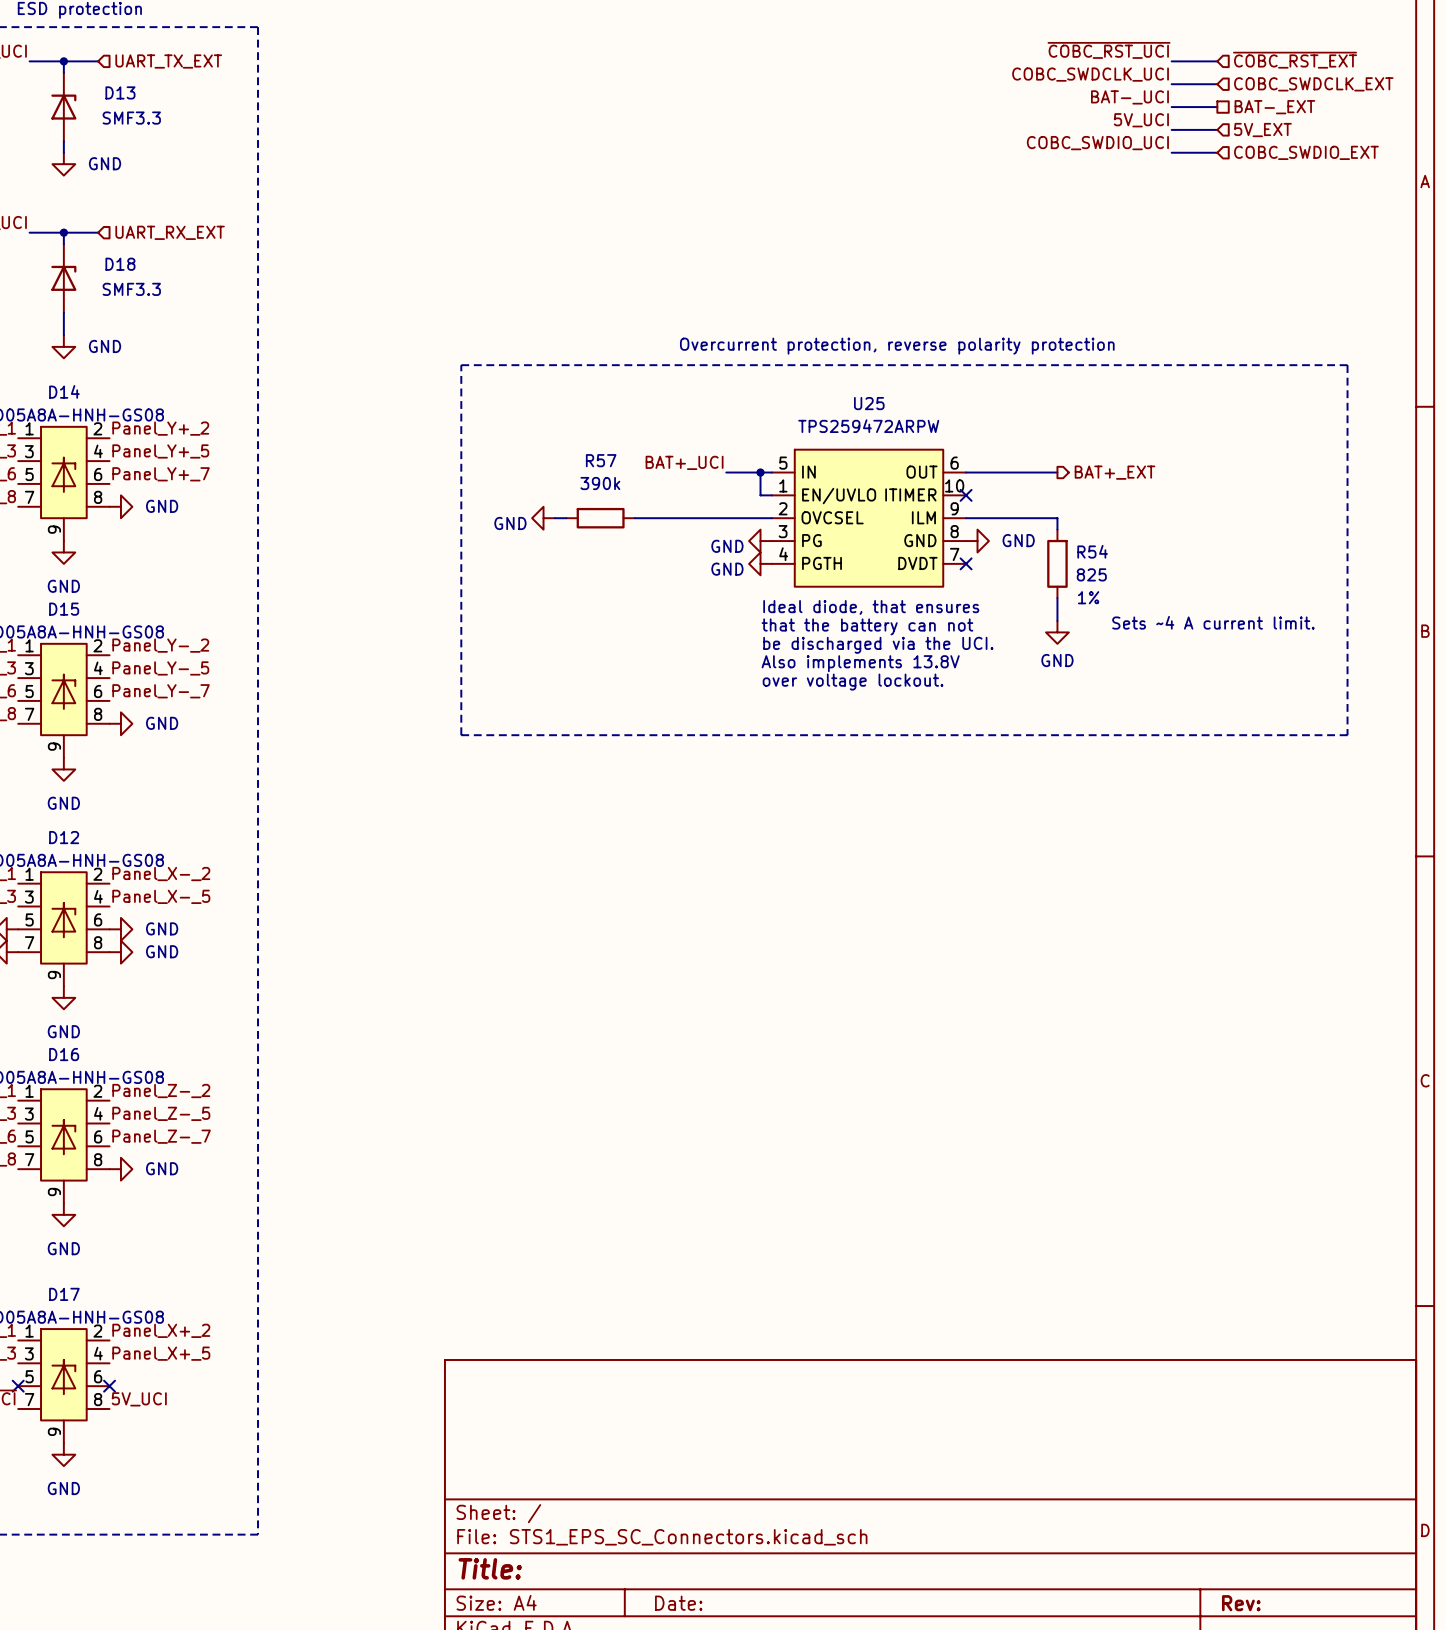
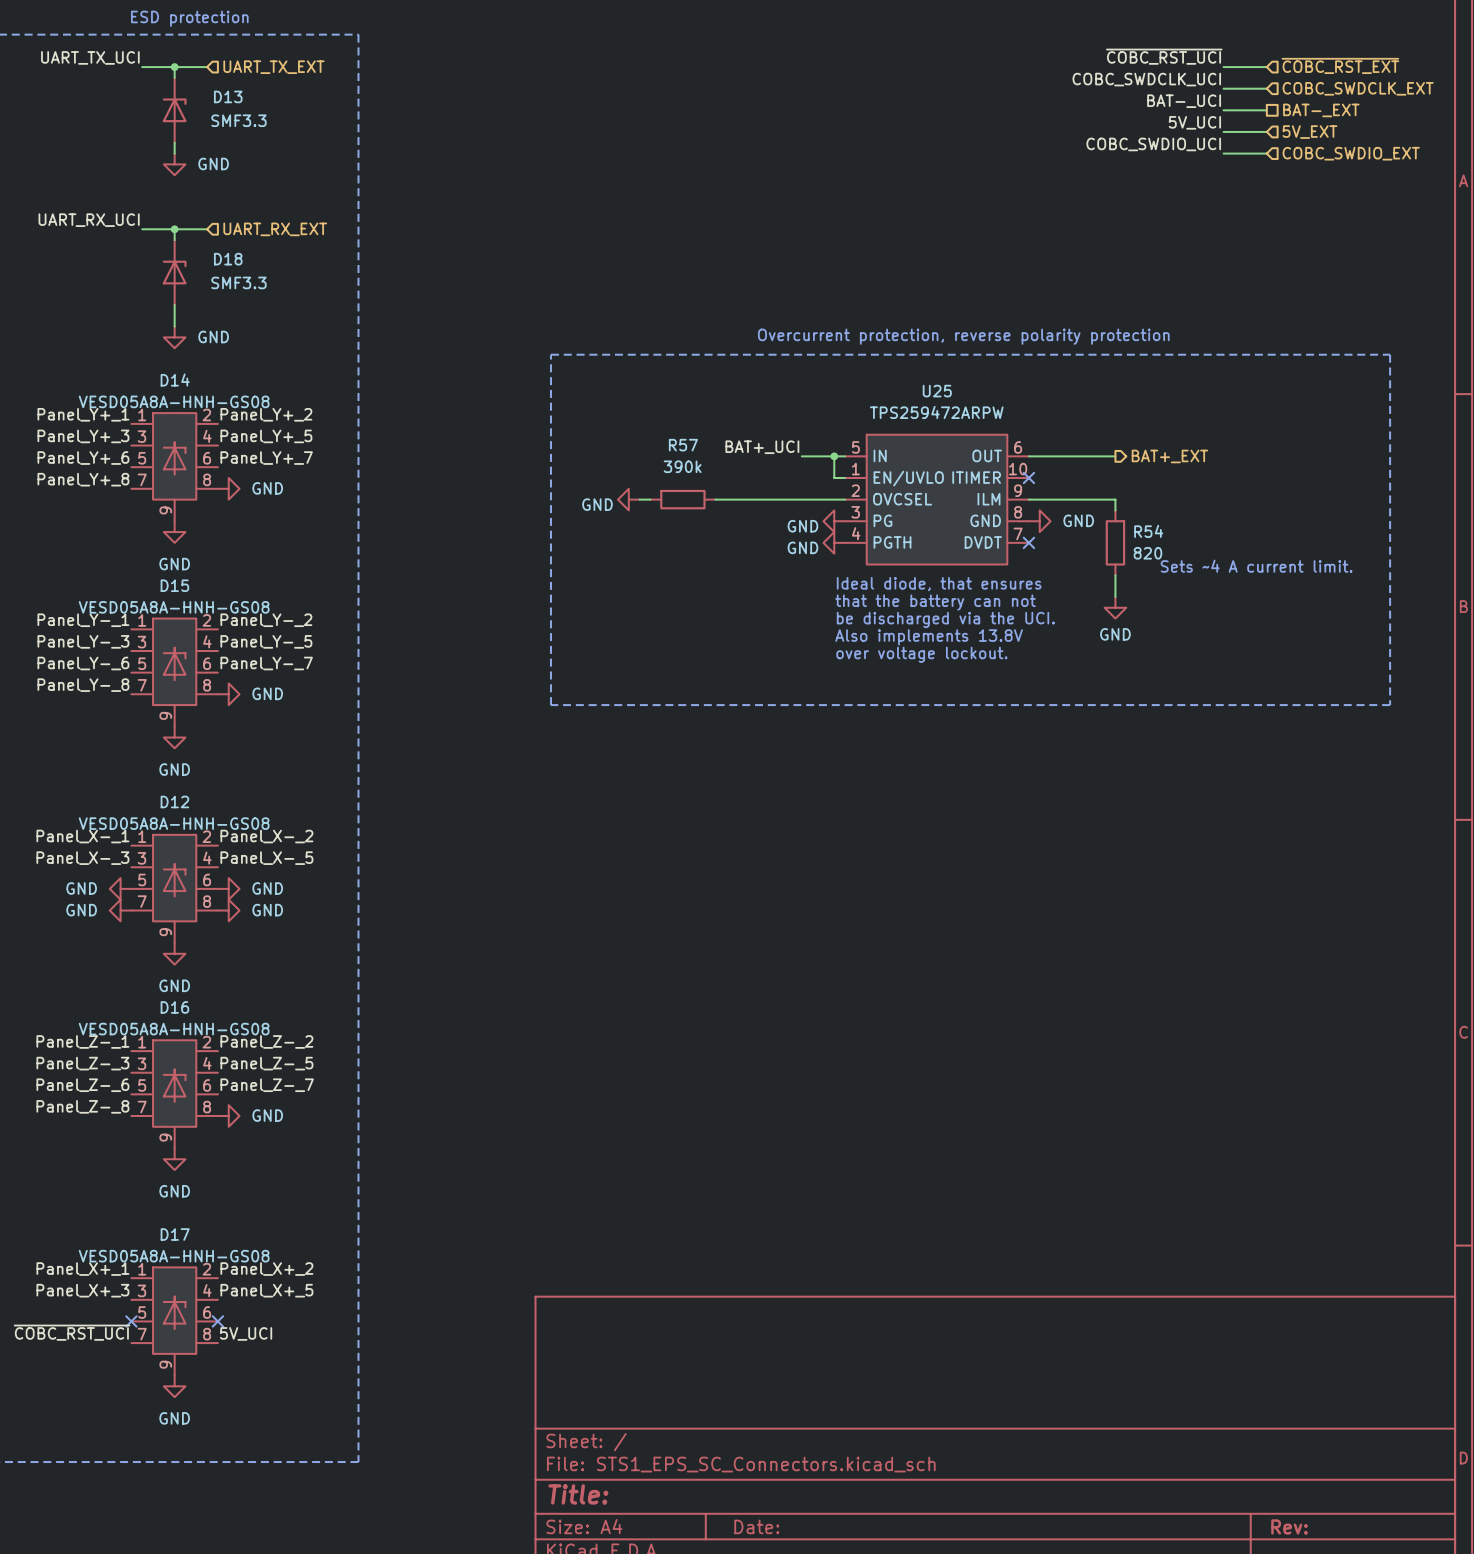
R54 value: 825 (1091, 574) -> 820 (1147, 553)
R54 text: 1% (1088, 597) -> none
text position: Sets ~4 A current limit. (1213, 622) -> Sets ~4 A current limit. (1256, 566)

